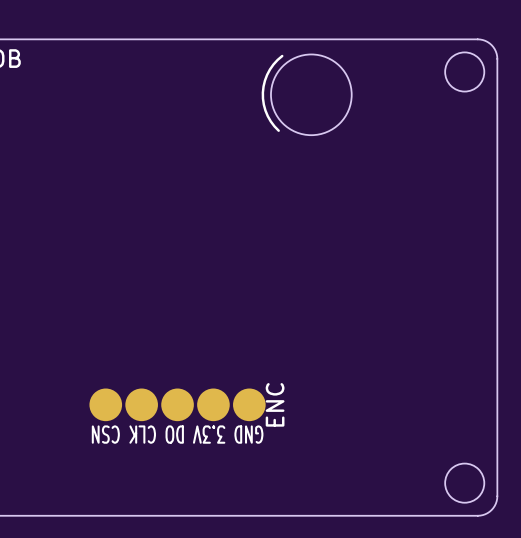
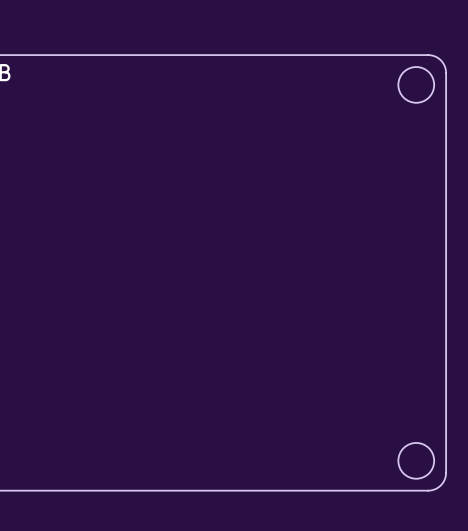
round board edge: [270, 53, 353, 137] -> none
line: (282, 56) (269, 69) (264, 80) (262, 92) (265, 110) (270, 121) (278, 130) -> none
part: (105, 404) -> none
part: (141, 404) -> none
part: (177, 404) -> none
part: (213, 404) -> none
part: (249, 404) -> none
text: ENC (275, 404) -> none
text: GND 3.3V DO CLK CSN (177, 434) -> none

